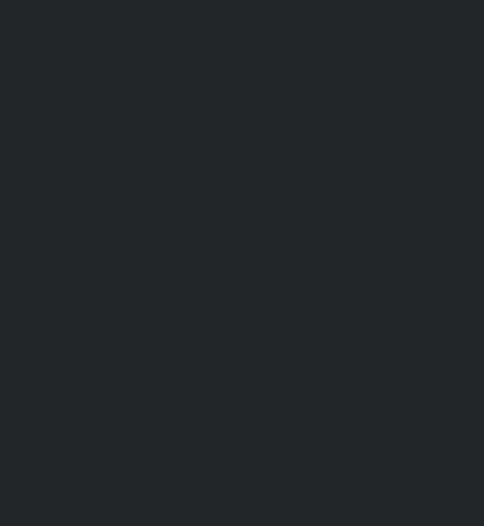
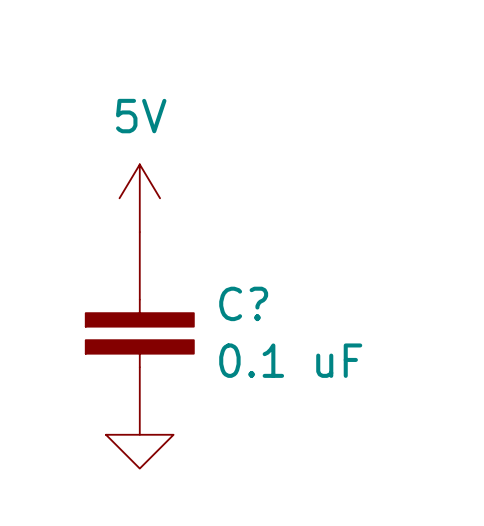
power symbol: none -> 5V (139, 198)
C?: none -> 0.1 uF (139, 333)
power symbol: none -> (139, 451)

